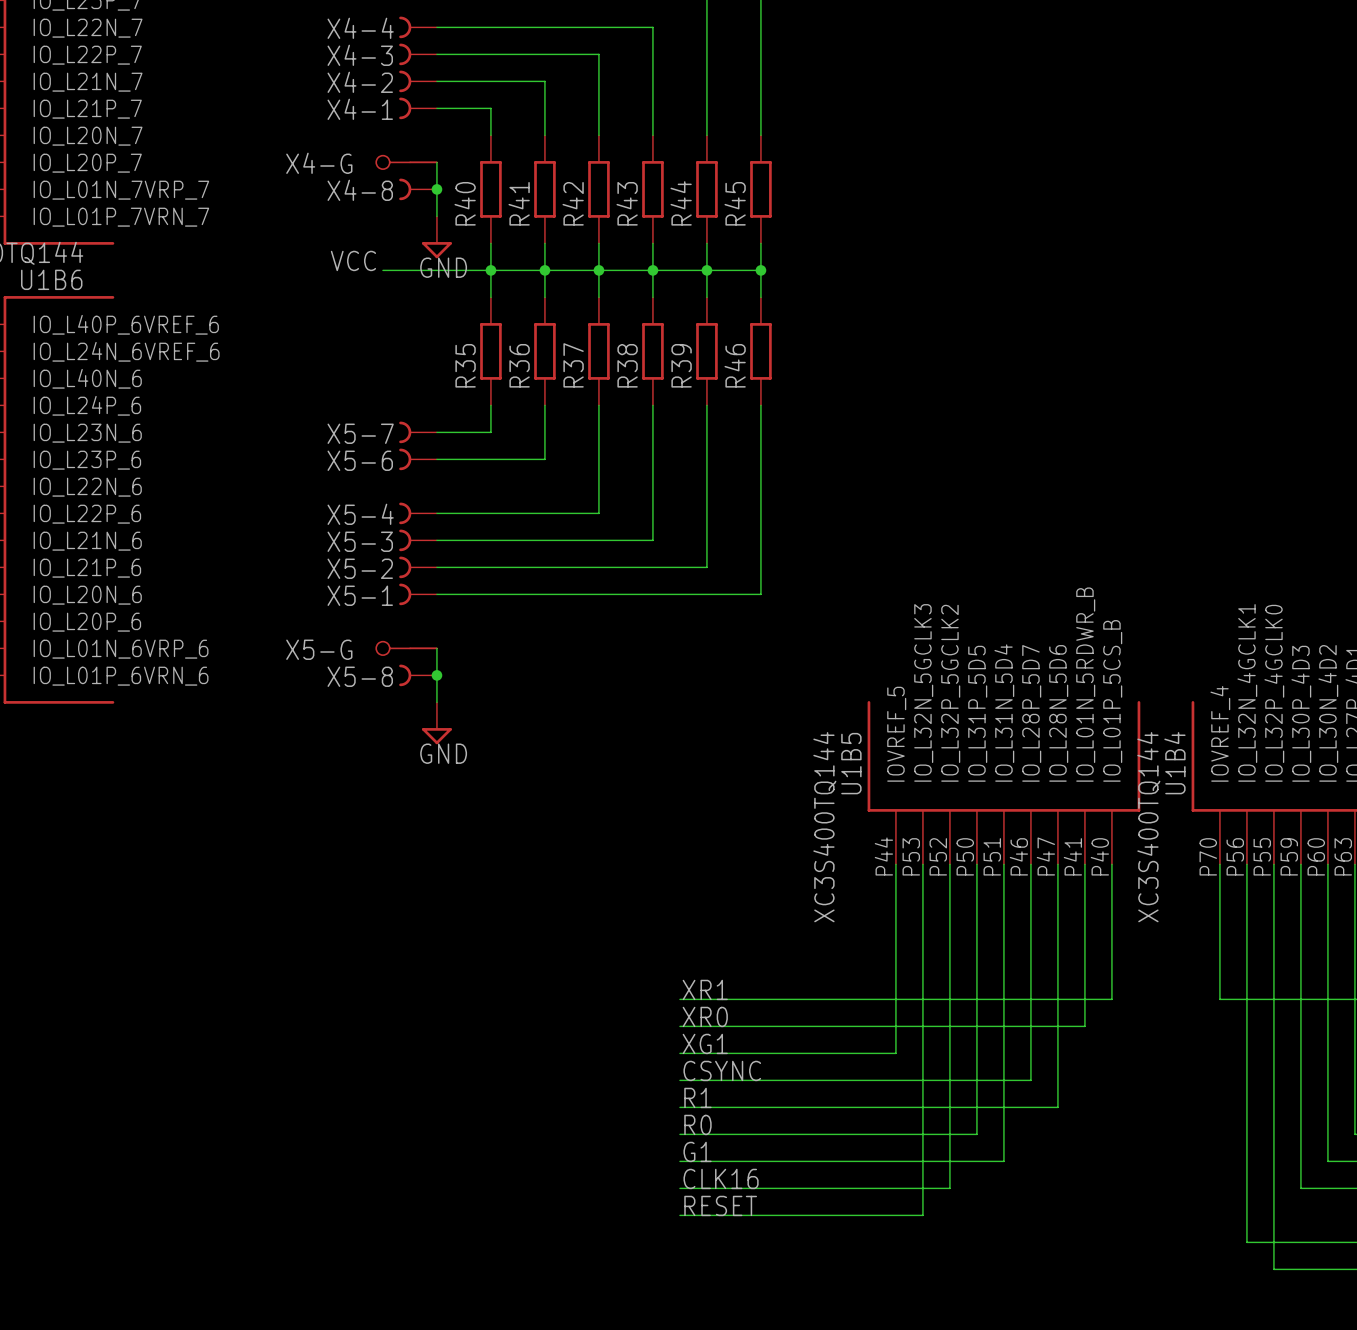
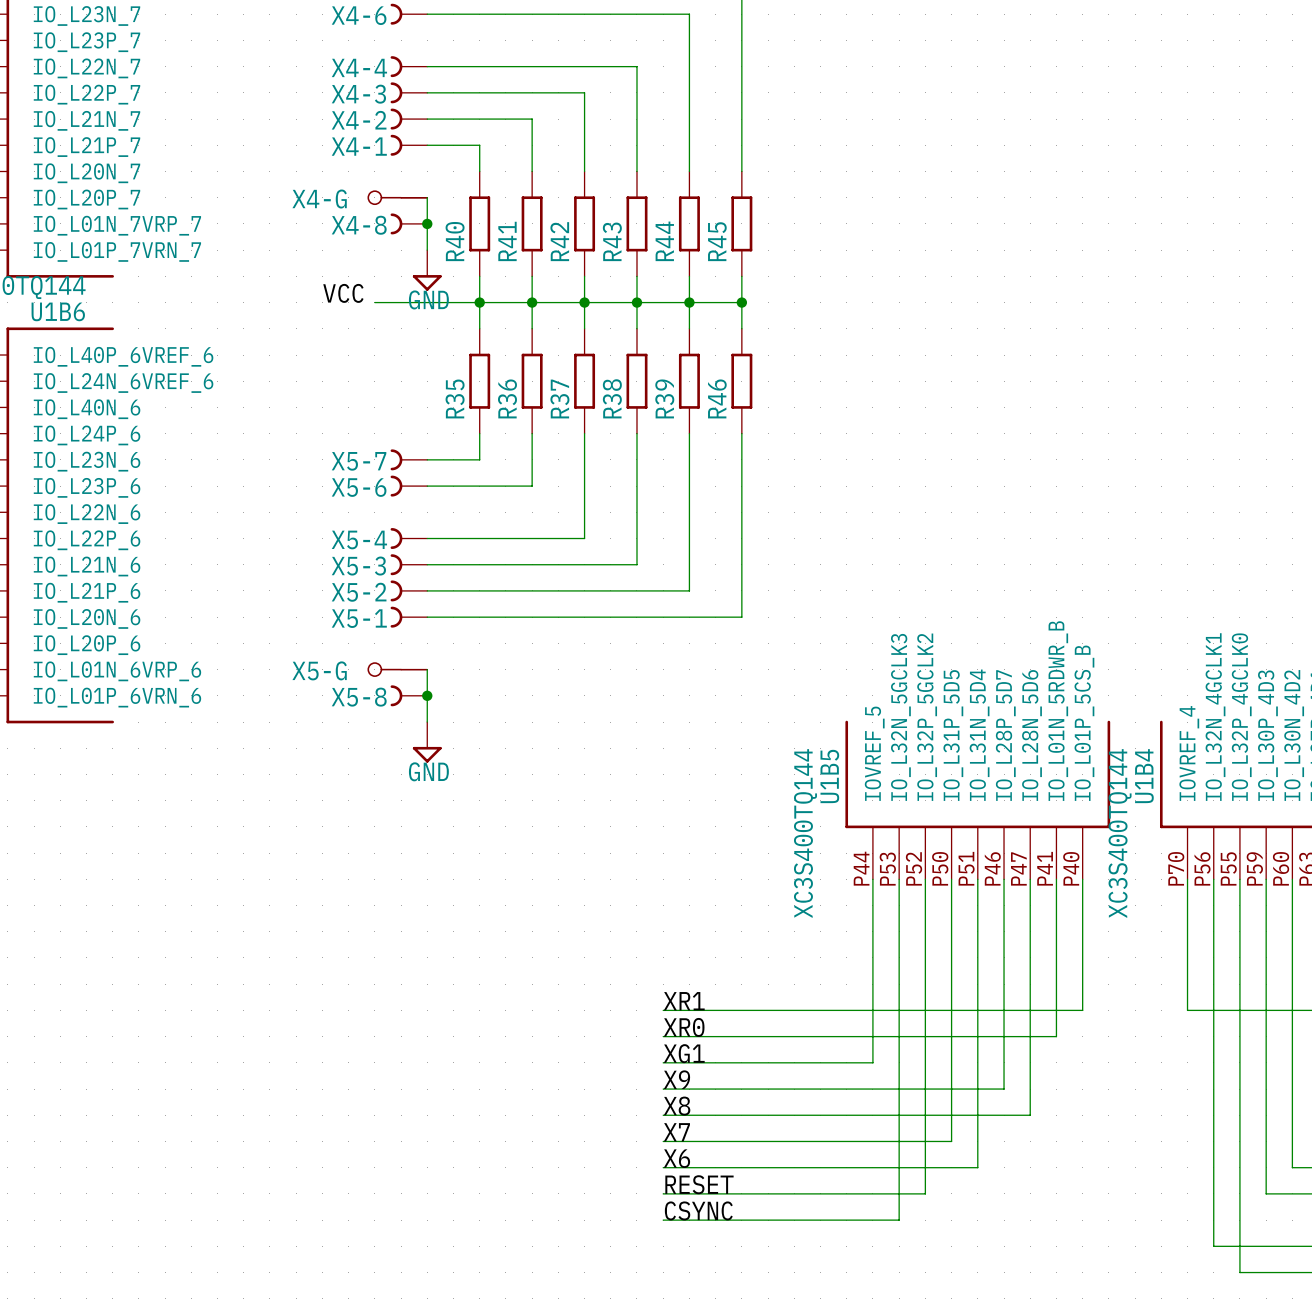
label: CSYNC (722, 1070) -> X9 (676, 1079)
label: R1 (697, 1097) -> X8 (677, 1106)
label: R0 (697, 1124) -> X7 (676, 1132)
label: G1 (697, 1151) -> X6 (676, 1158)
label: CLK16 (721, 1178) -> RESET (699, 1184)
label: RESET (720, 1205) -> CSYNC (698, 1210)

